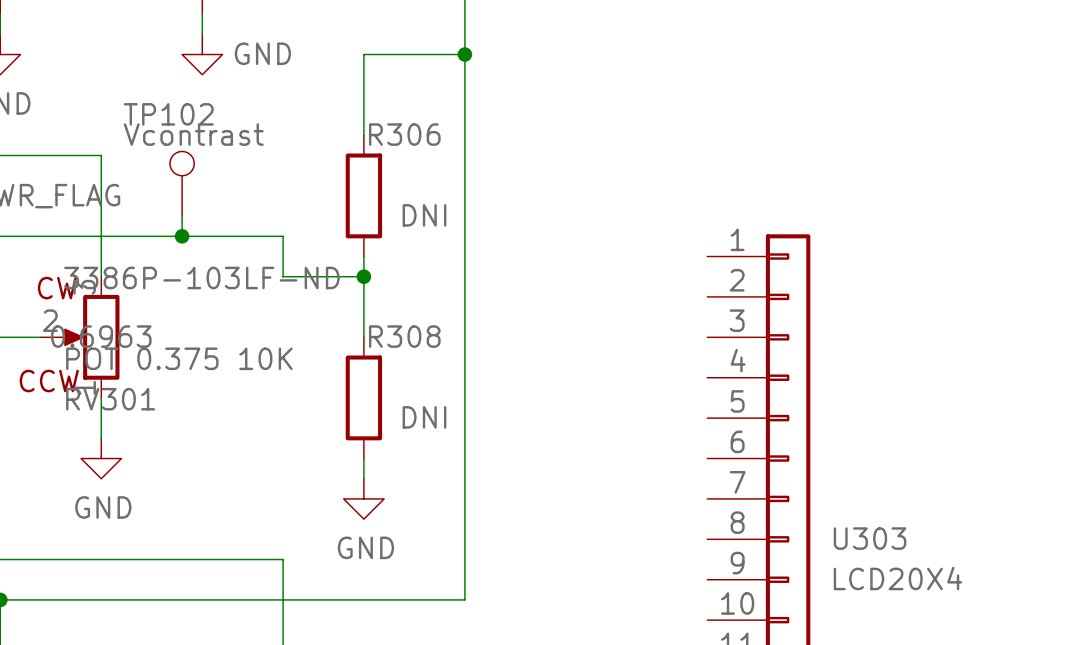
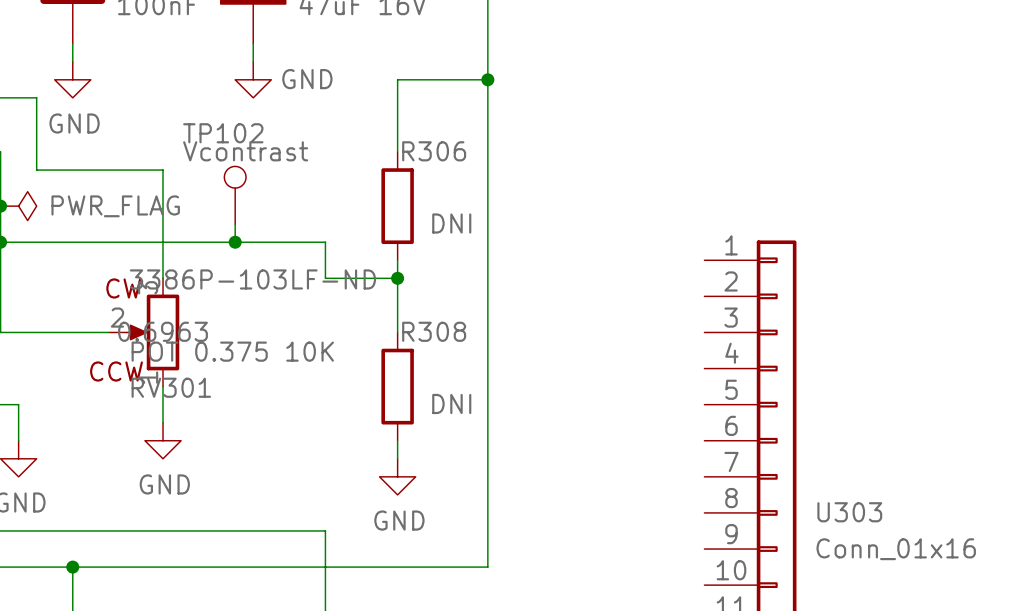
U303 value: LCD20X4 (897, 578) -> Conn_01x16 (896, 549)

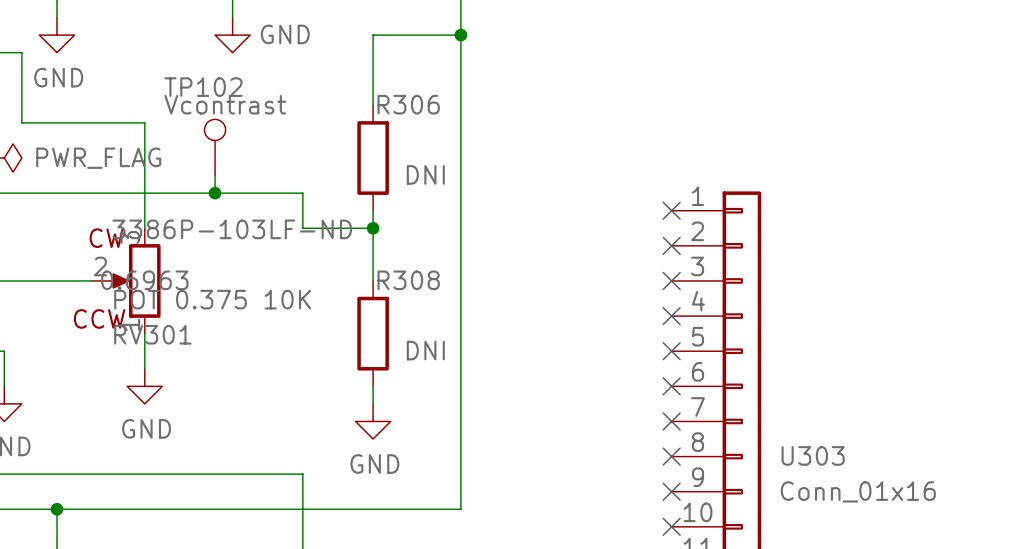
no-connect mark: none -> (671, 210)
no-connect mark: none -> (671, 245)
no-connect mark: none -> (671, 280)
no-connect mark: none -> (671, 316)
no-connect mark: none -> (671, 351)
no-connect mark: none -> (671, 386)
no-connect mark: none -> (671, 421)
no-connect mark: none -> (671, 456)
no-connect mark: none -> (671, 491)
no-connect mark: none -> (671, 526)

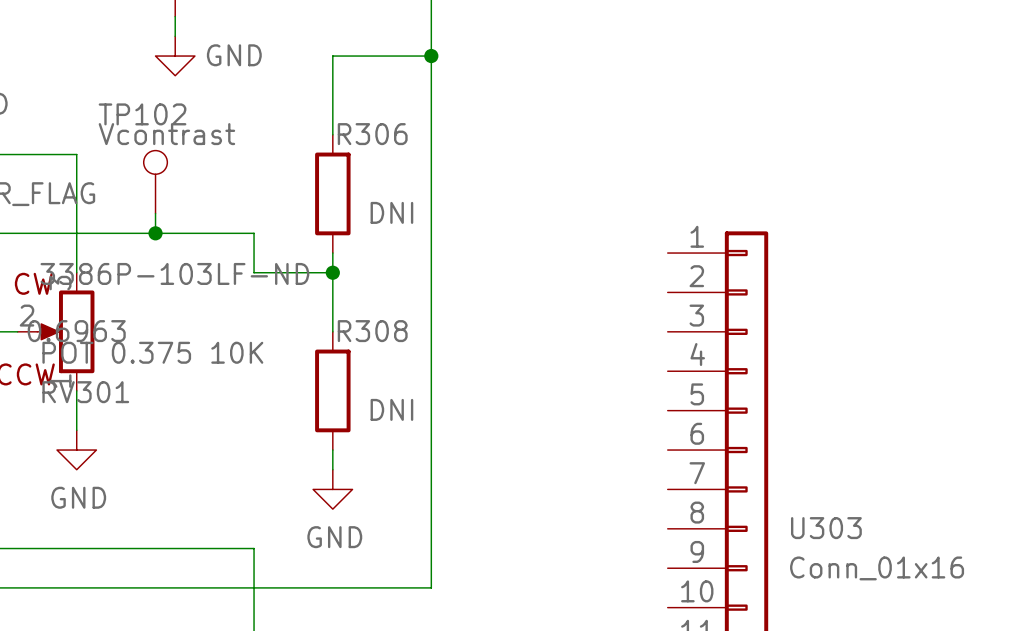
no-connect mark: (671, 210) -> none
no-connect mark: (671, 245) -> none
no-connect mark: (671, 280) -> none
no-connect mark: (671, 316) -> none
no-connect mark: (671, 351) -> none
no-connect mark: (671, 386) -> none
no-connect mark: (671, 421) -> none
no-connect mark: (671, 456) -> none
no-connect mark: (671, 491) -> none
no-connect mark: (671, 526) -> none

